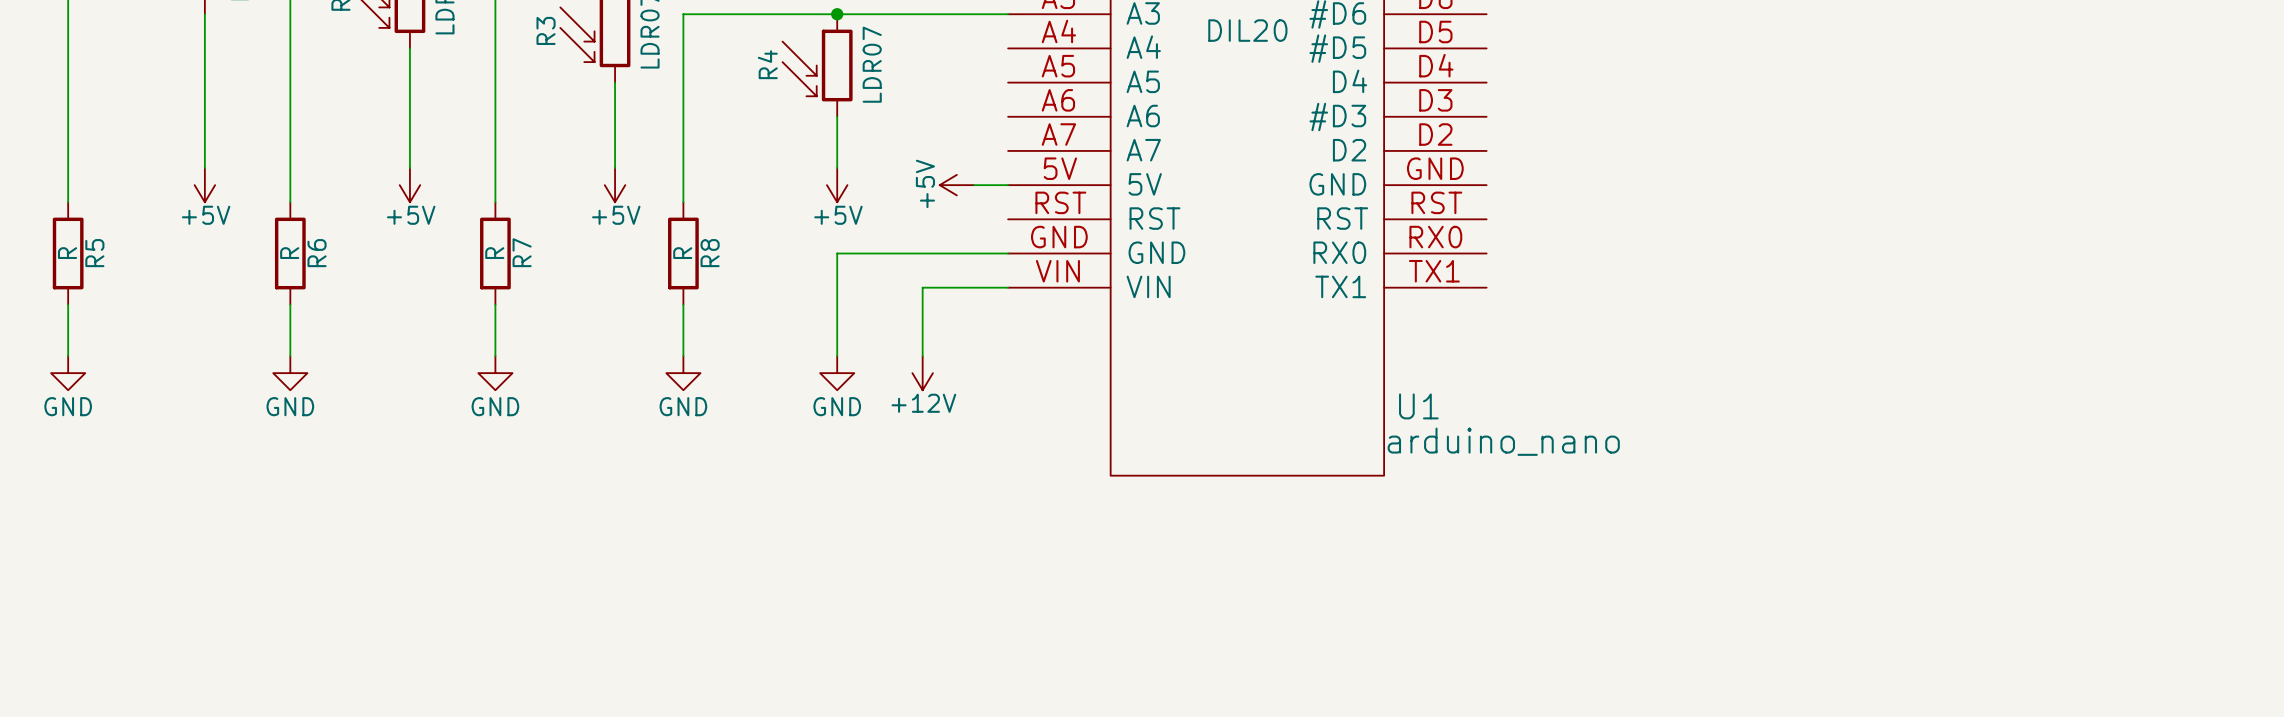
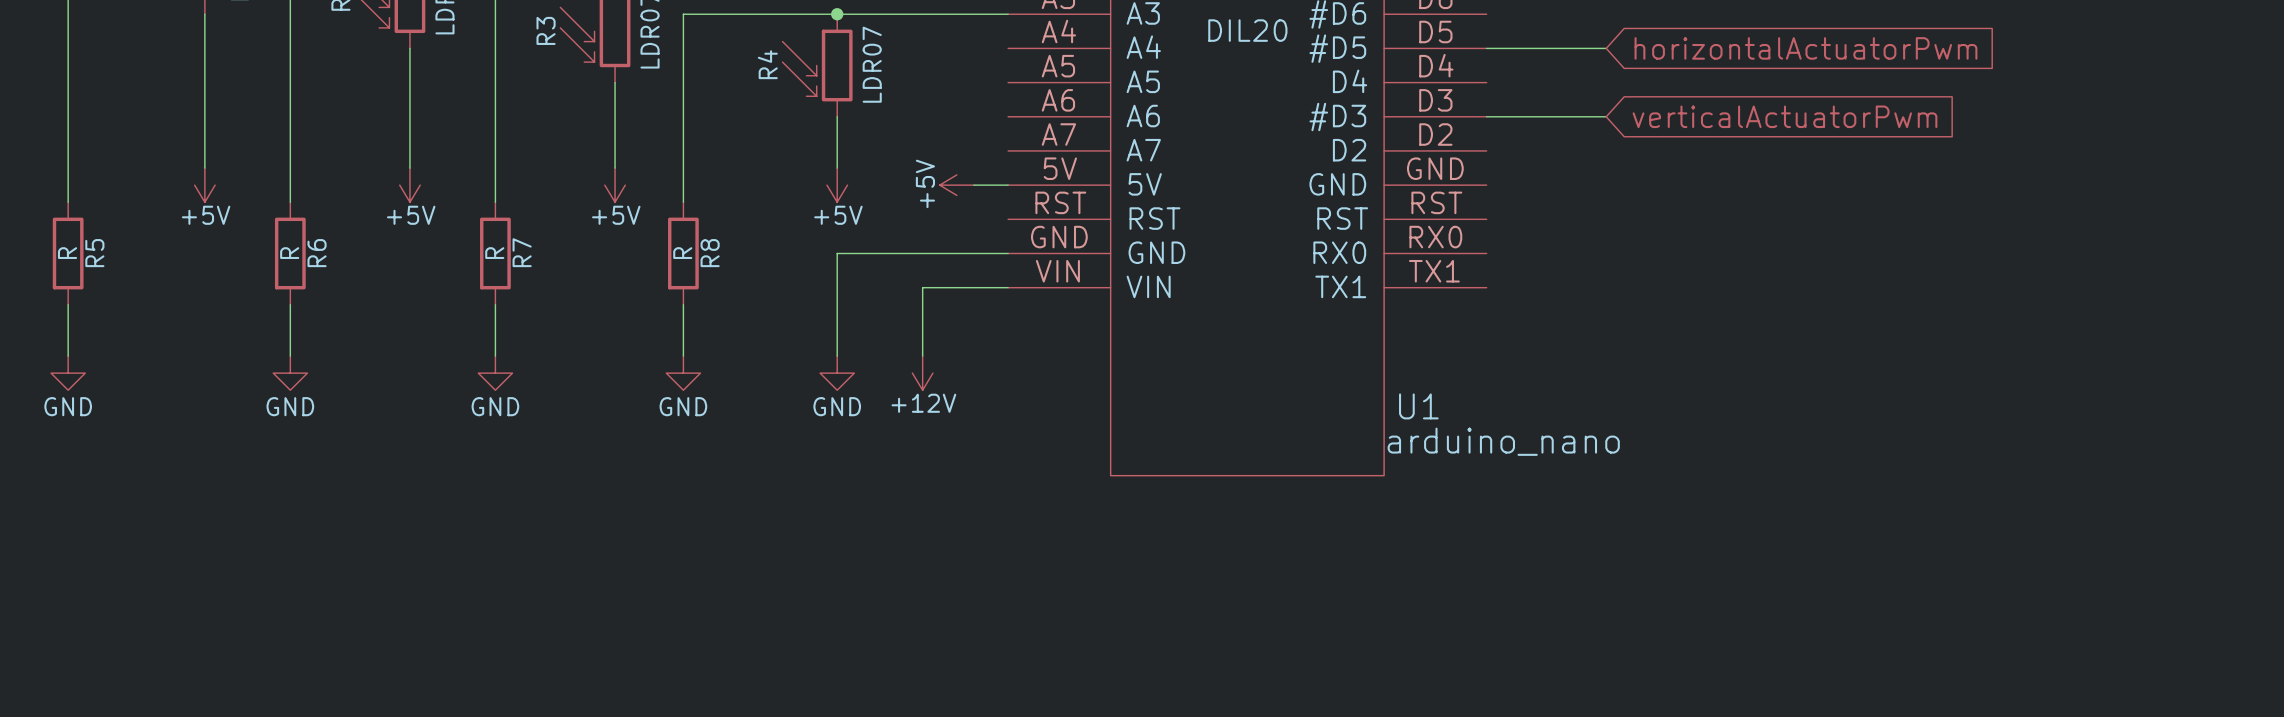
wire: none -> (1486, 48) (1606, 48)
global label: none -> horizontalActuatorPwm (1805, 48)
wire: none -> (1486, 116) (1606, 116)
global label: none -> verticalActuatorPwm (1784, 116)

